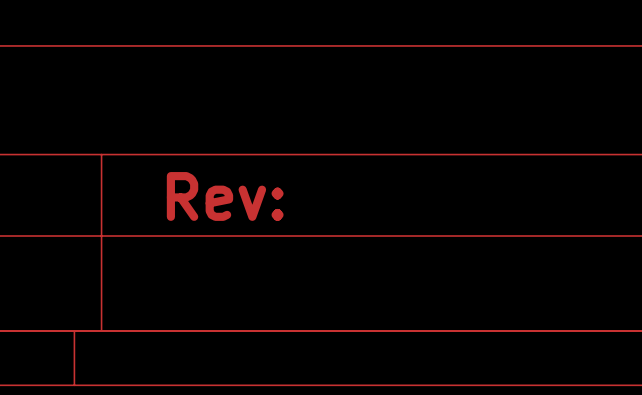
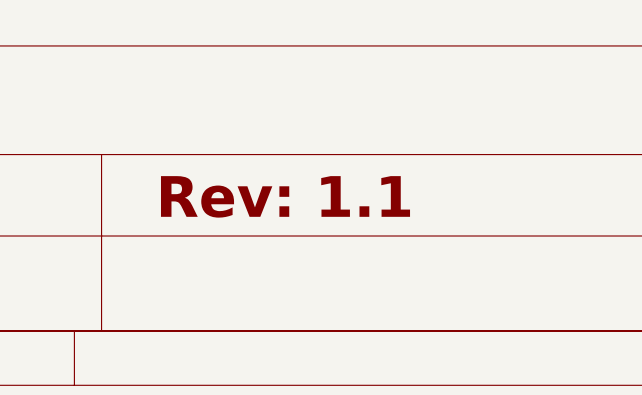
title block: Rev: (225, 196) -> Rev: 1.1 (285, 196)

